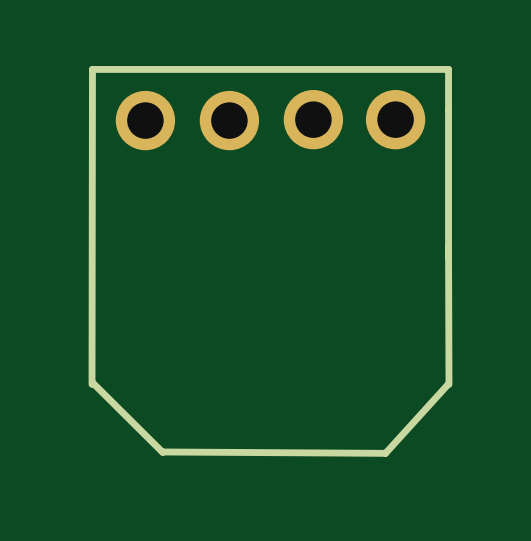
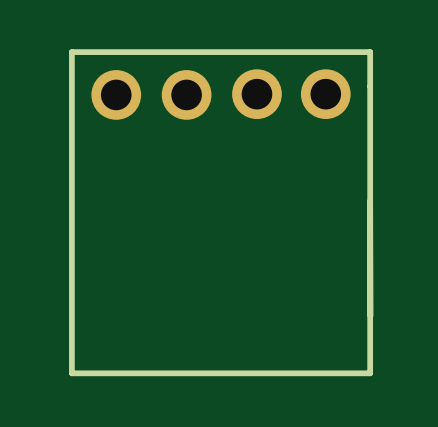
board edge: (92, 69) (92, 384) -> (71, 52) (71, 373) (370, 373) (370, 208)
board edge: (92, 383) (162, 452) -> none
board edge: (448, 383) (385, 453) (162, 451) -> none

